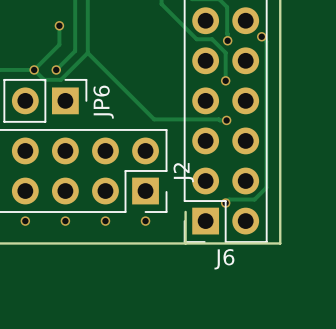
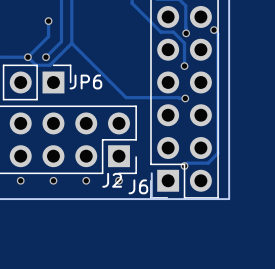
JP6 name rotation: 0° (103, 102) -> 90° clockwise (85, 81)
J2 name rotation: 0° (183, 172) -> 90° clockwise (112, 180)
J2 name position: J2 (183, 172) -> J2 (112, 180)
J6 name position: J6 (224, 259) -> J6 (138, 186)

